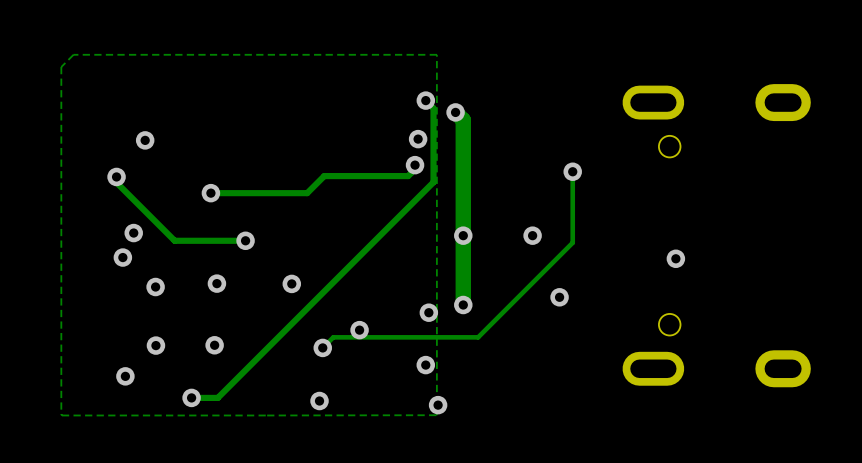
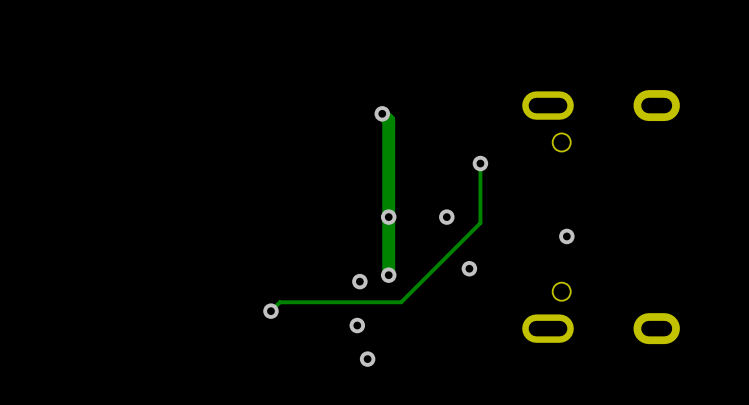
zone outline: (436, 54) (73, 54) (61, 67) (61, 414) (436, 415) (436, 54) -> none
track: (425, 100) (433, 108) (433, 182) (217, 397) (191, 397) -> none
via: (425, 100) -> none
via: (418, 139) -> none
via: (145, 140) -> none
track: (415, 165) (408, 176) (324, 176) (307, 193) (210, 193) -> none
via: (415, 165) -> none
track: (116, 176) (116, 182) (174, 240) (245, 240) -> none
via: (116, 176) -> none
via: (210, 193) -> none
via: (133, 233) -> none
via: (245, 240) -> none
via: (122, 257) -> none
via: (216, 283) -> none
via: (291, 283) -> none
via: (155, 287) -> none
via: (359, 330) -> none
via: (155, 345) -> none
via: (214, 345) -> none
via: (125, 376) -> none
via: (191, 397) -> none
via: (319, 401) -> none

